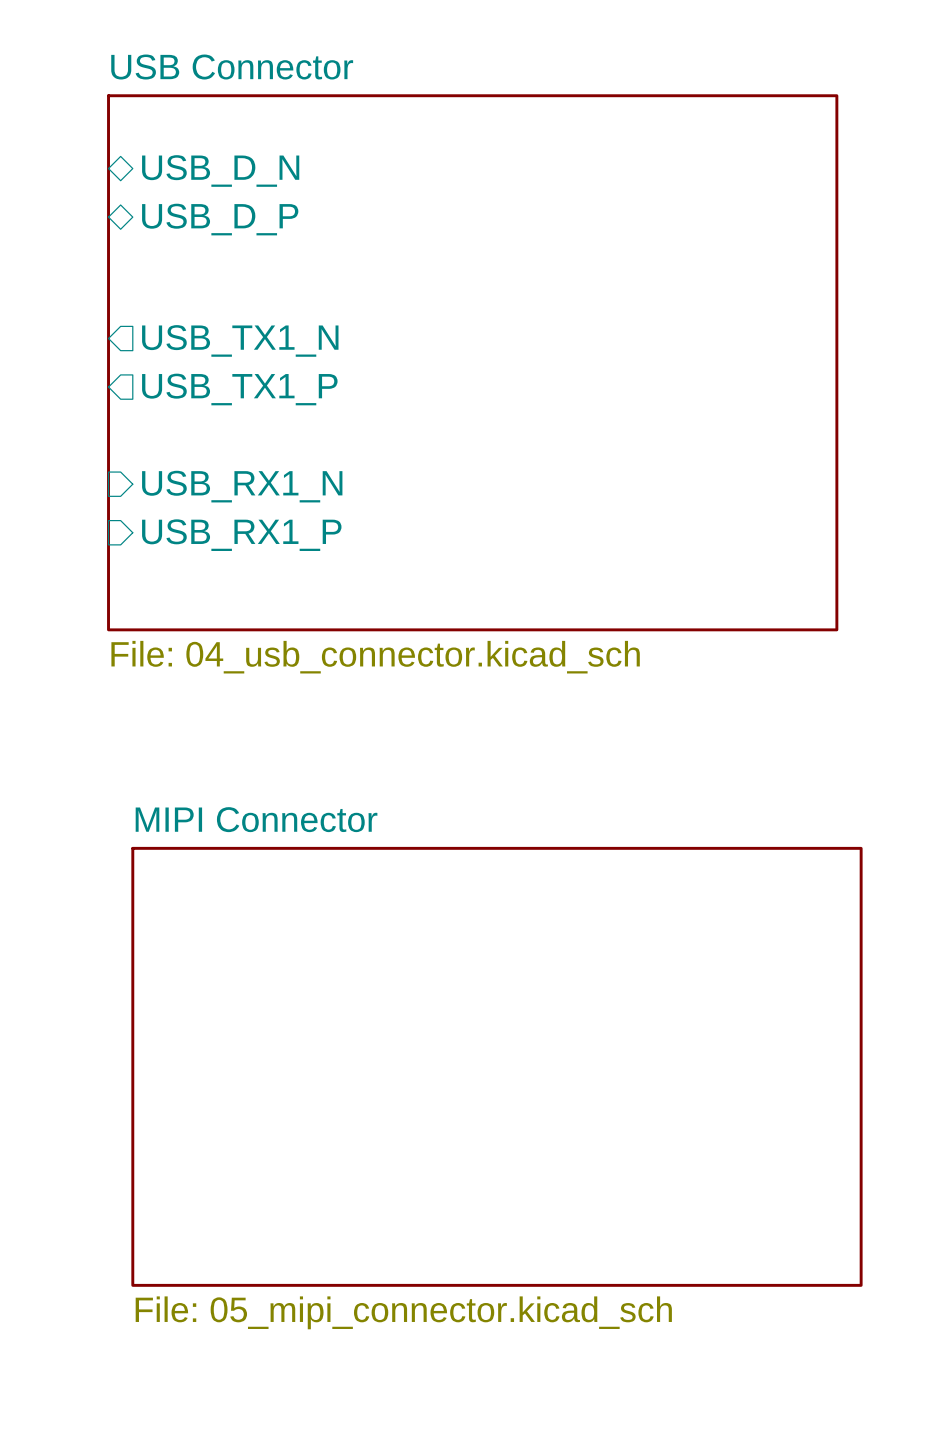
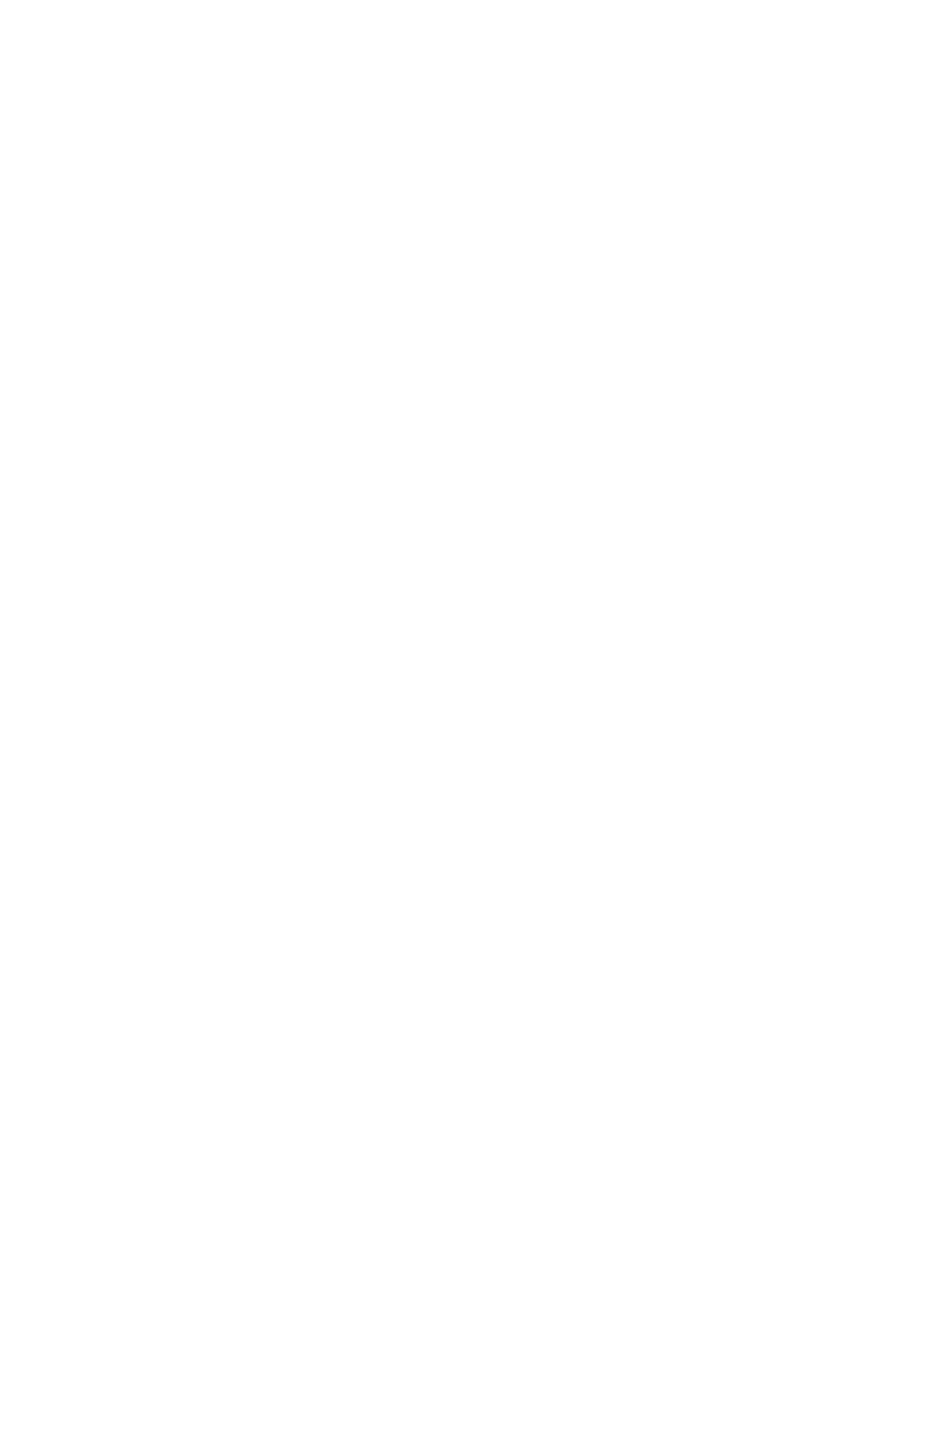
sheet pin: USB_D_N (220, 170) -> none
sheet pin: USB_D_P (220, 219) -> none
sheet pin: USB_TX1_N (240, 340) -> none
sheet USB Connector: File: 04_usb_connector.kicad_sch (472, 362) -> none
sheet pin: USB_TX1_P (239, 389) -> none
sheet pin: USB_RX1_N (242, 486) -> none
sheet pin: USB_RX1_P (241, 535) -> none
sheet MIPI Connector: File: 05_mipi_connector.kicad_sch (496, 1066) -> none

